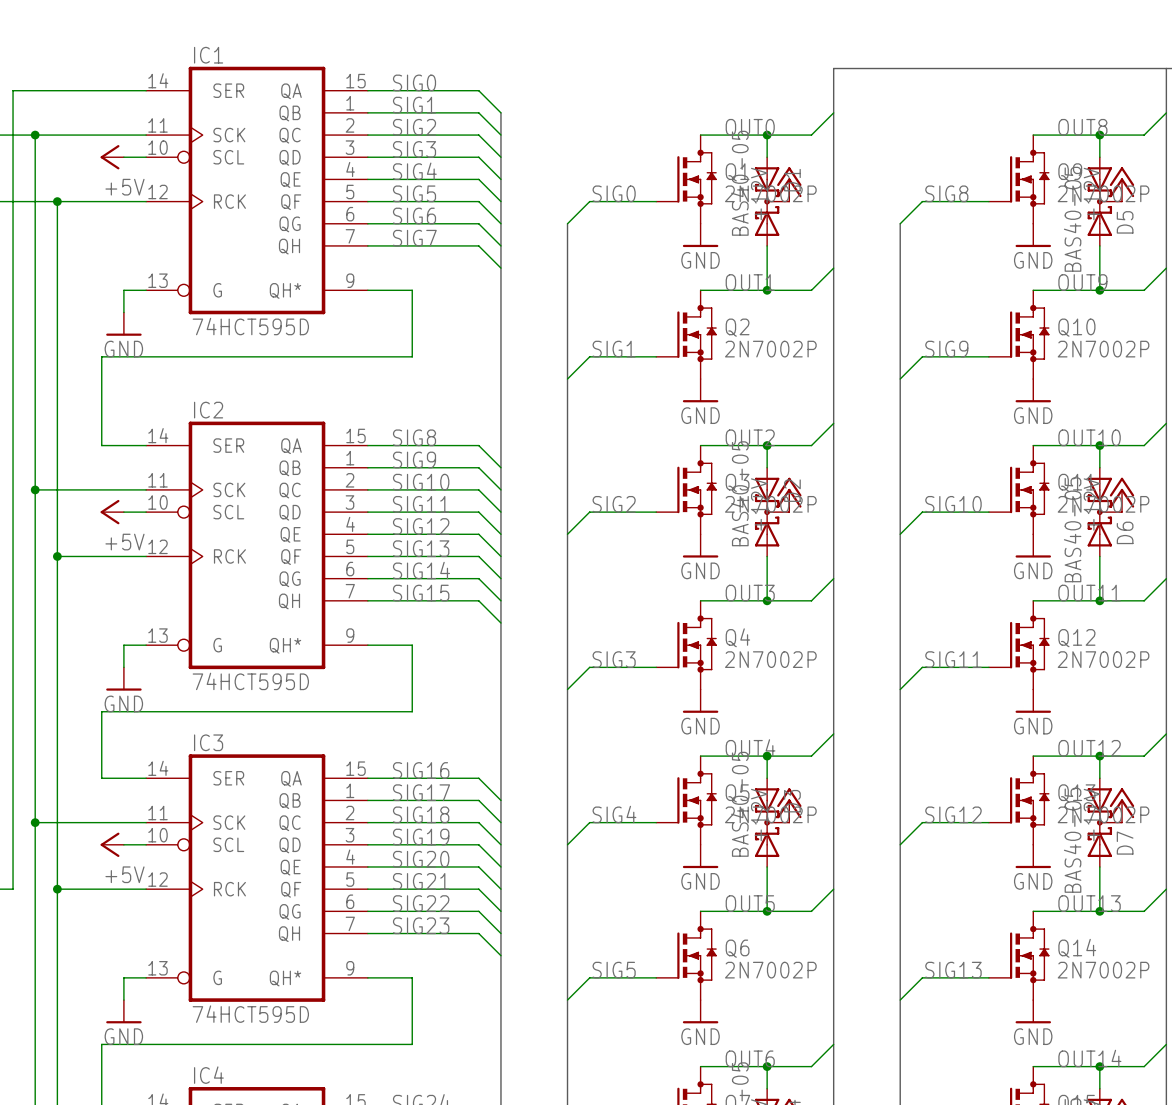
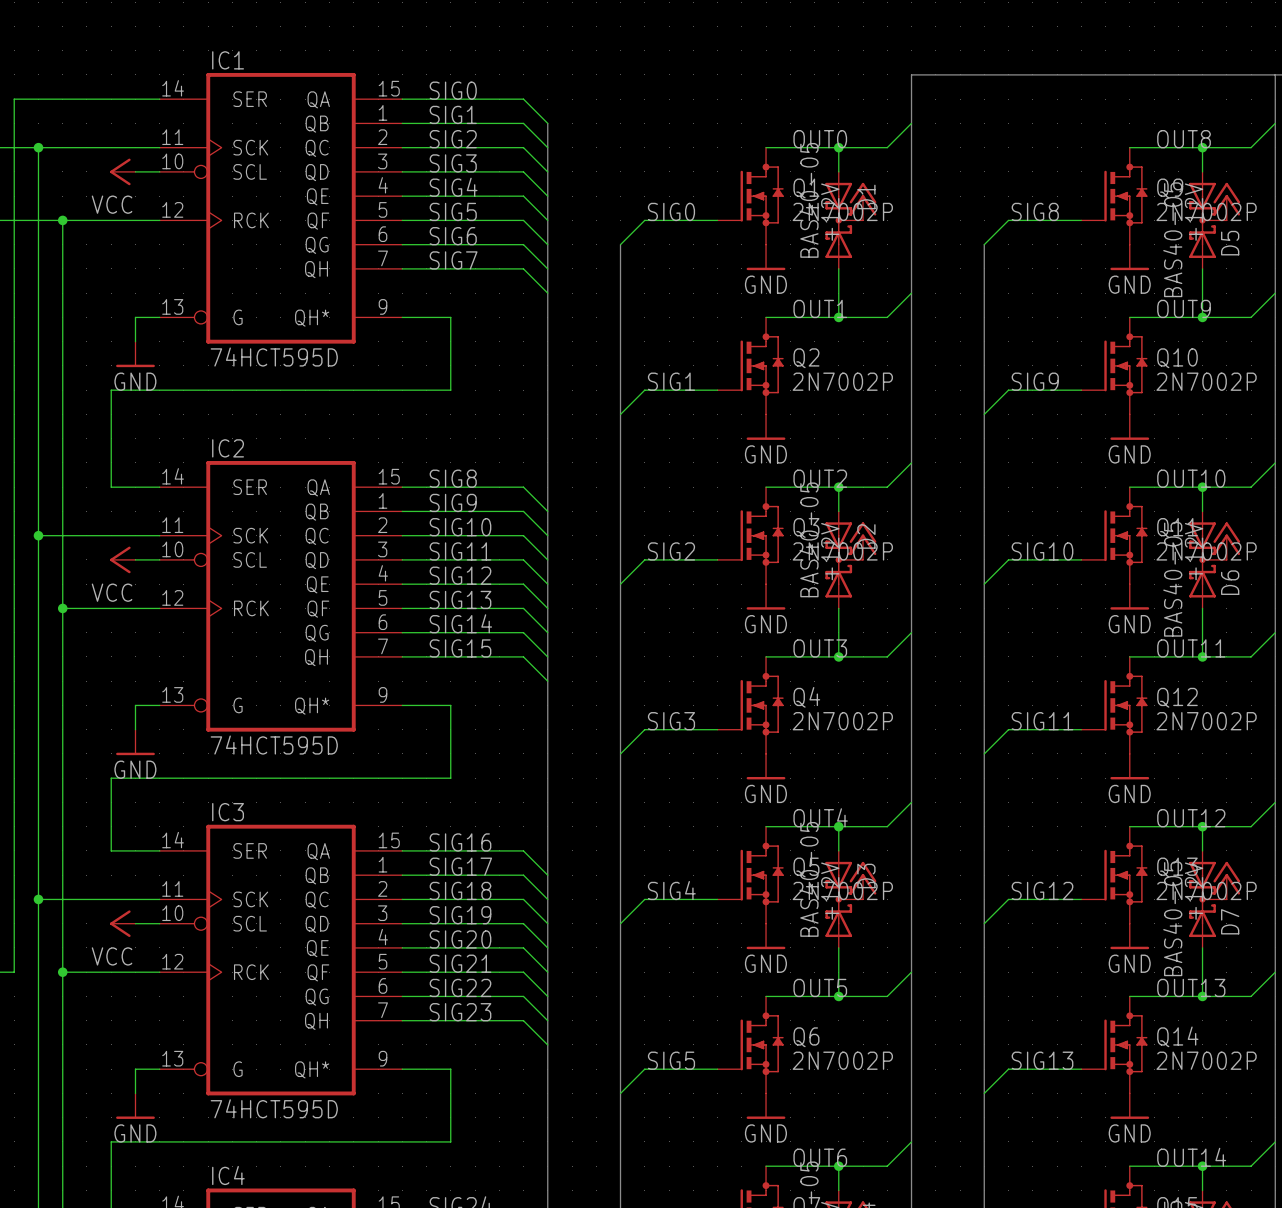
power symbol: +5V (112, 157) -> VCC (122, 171)
power symbol: +5V (112, 512) -> VCC (122, 559)
power symbol: +5V (112, 844) -> VCC (122, 923)

